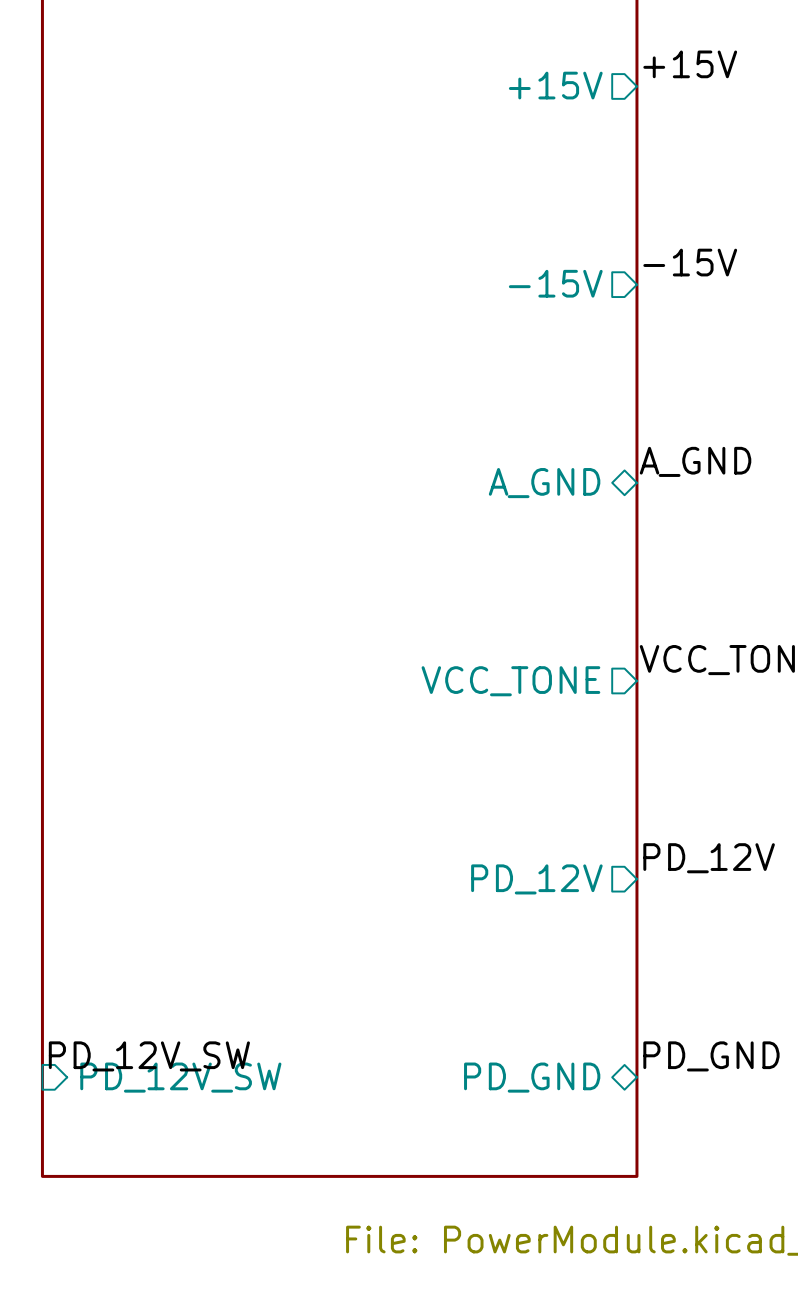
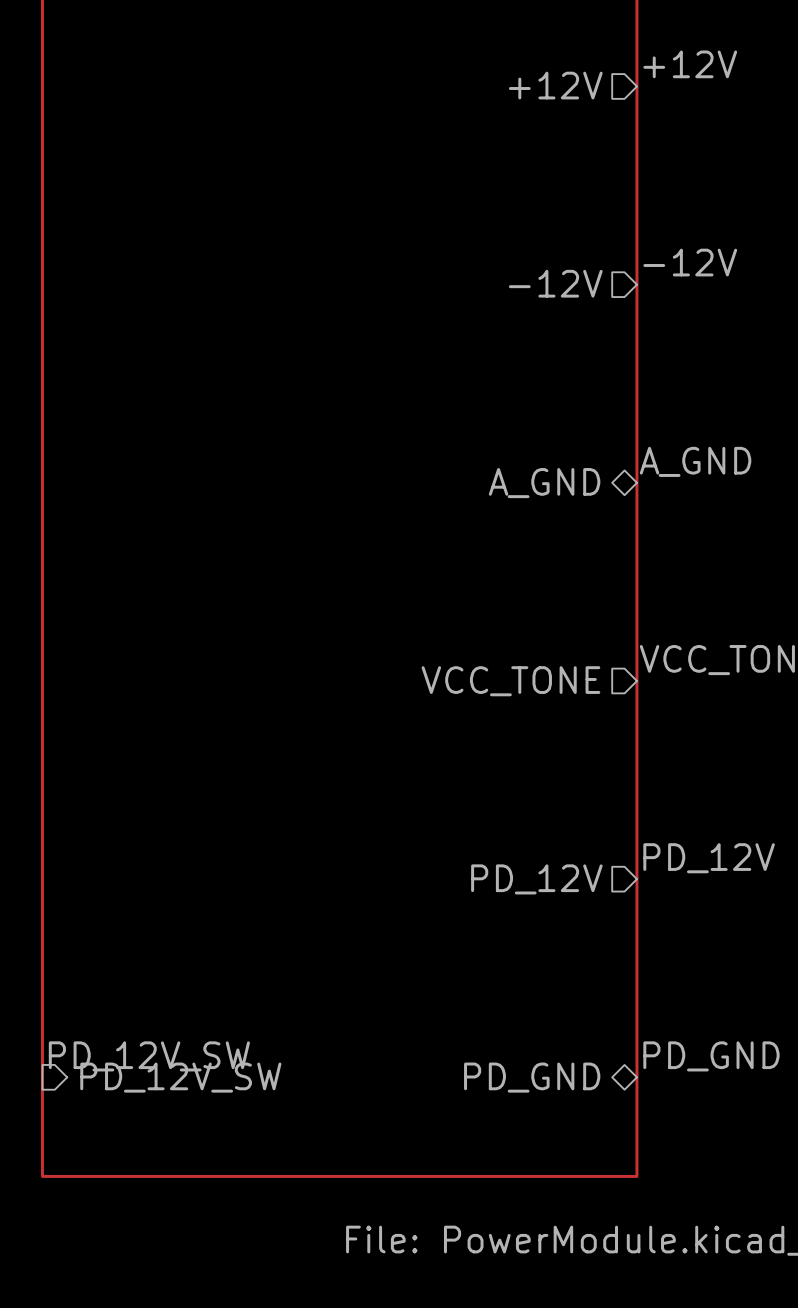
label: +15V (690, 64) -> +12V (690, 64)
sheet pin: +15V (555, 85) -> +12V (555, 85)
label: -15V (690, 262) -> -12V (690, 262)
sheet pin: -15V (555, 283) -> -12V (555, 283)

